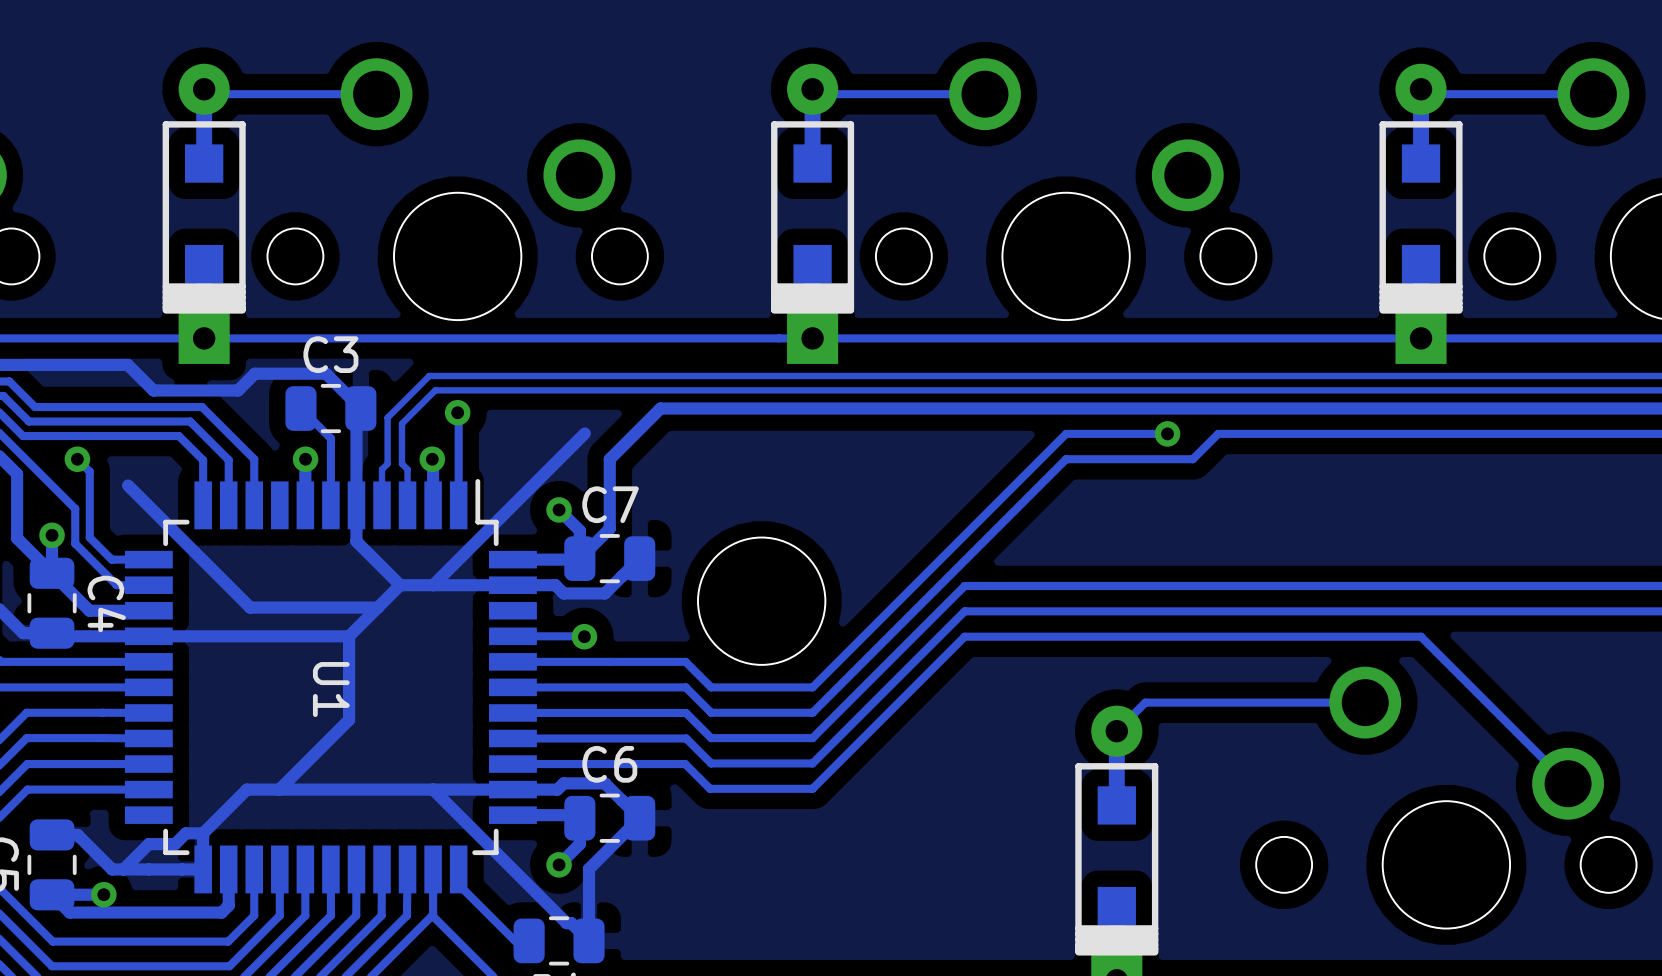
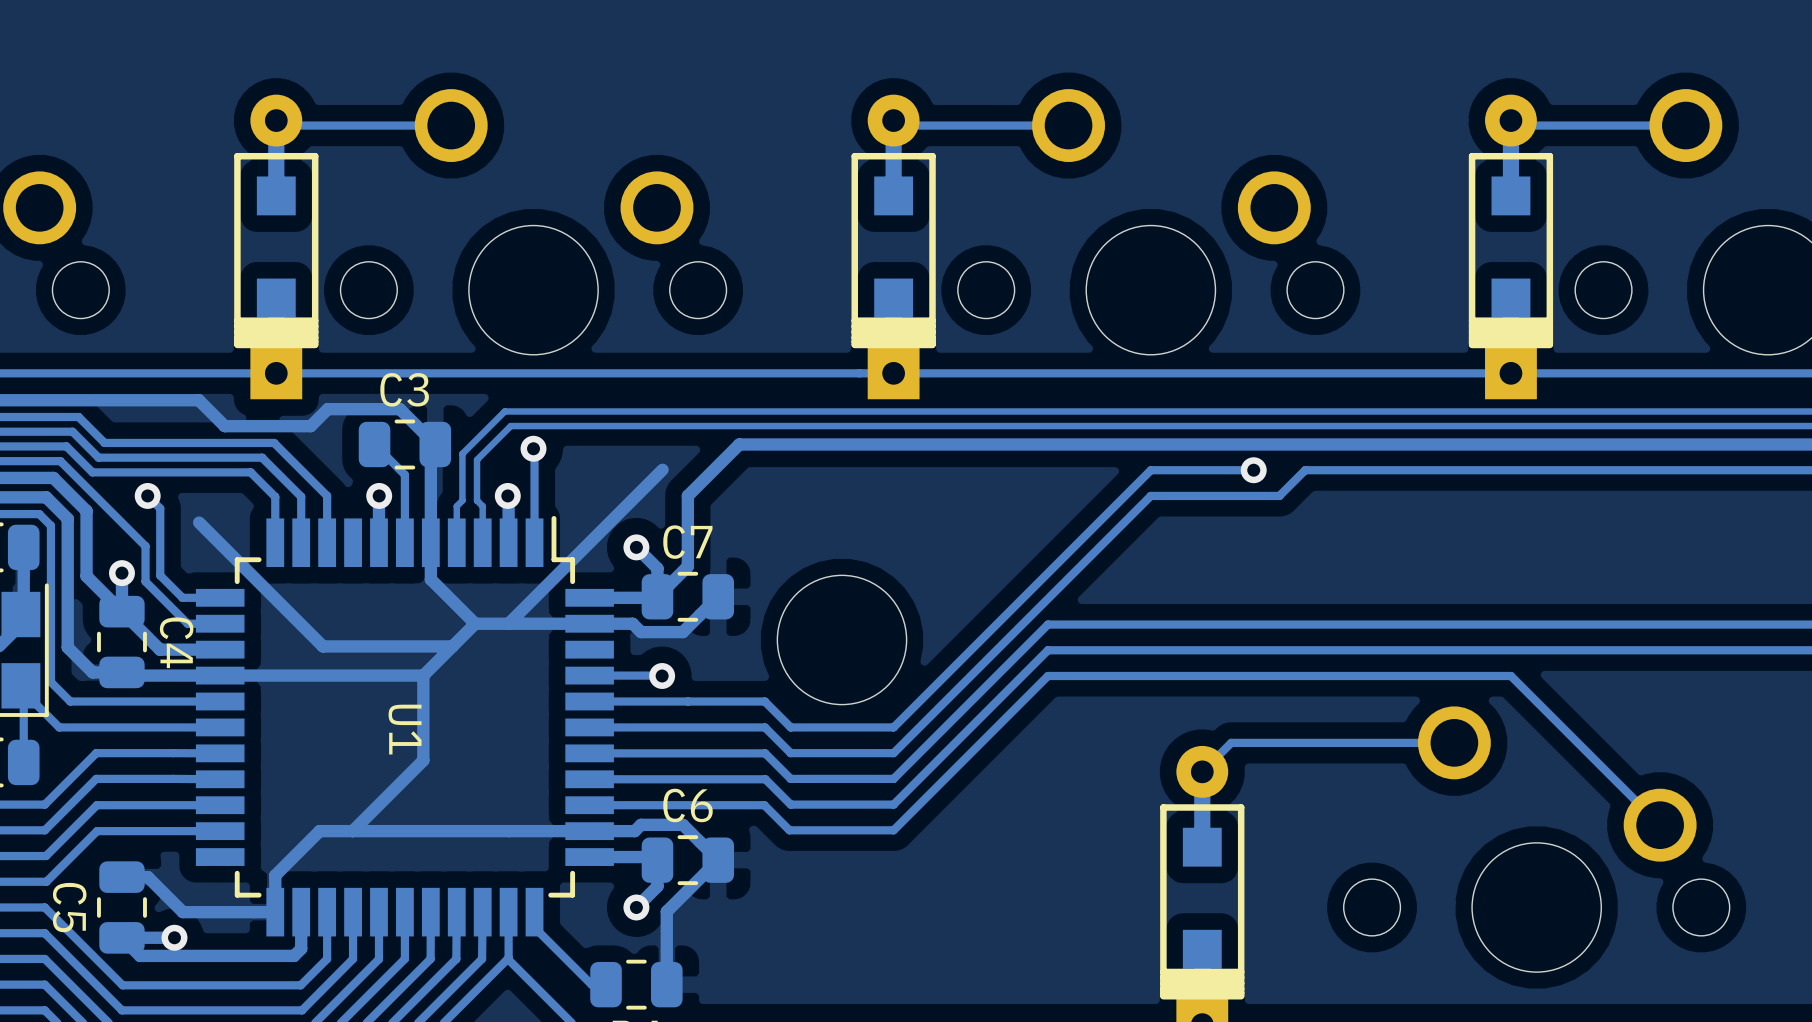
track: (433, 789) (566, 923) (571, 923) (589, 940) -> none
track: (203, 833) (185, 833) (175, 844) (148, 844) (123, 869) -> none

